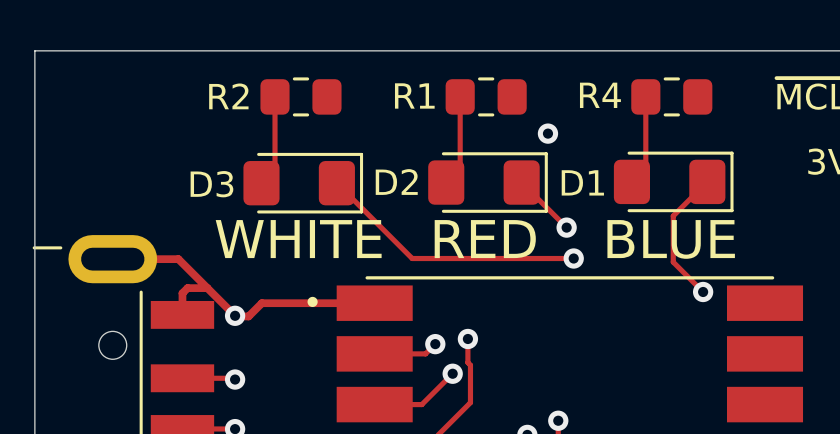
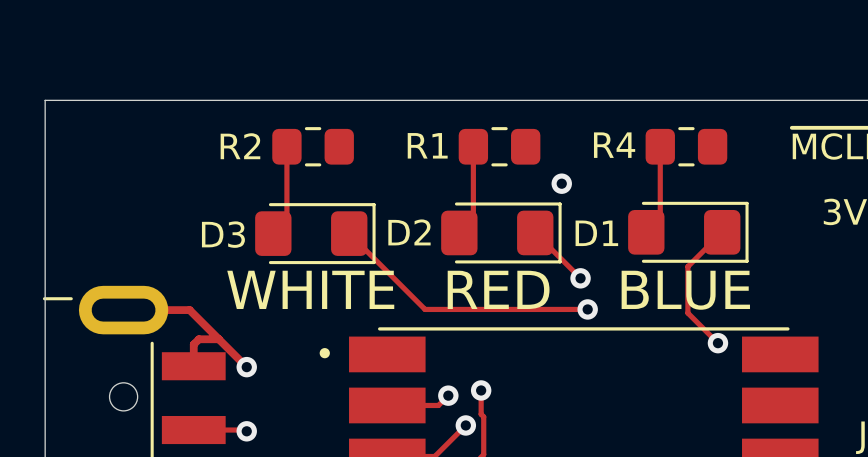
track: (374, 303) (261, 303) (248, 316) (235, 316) -> none

